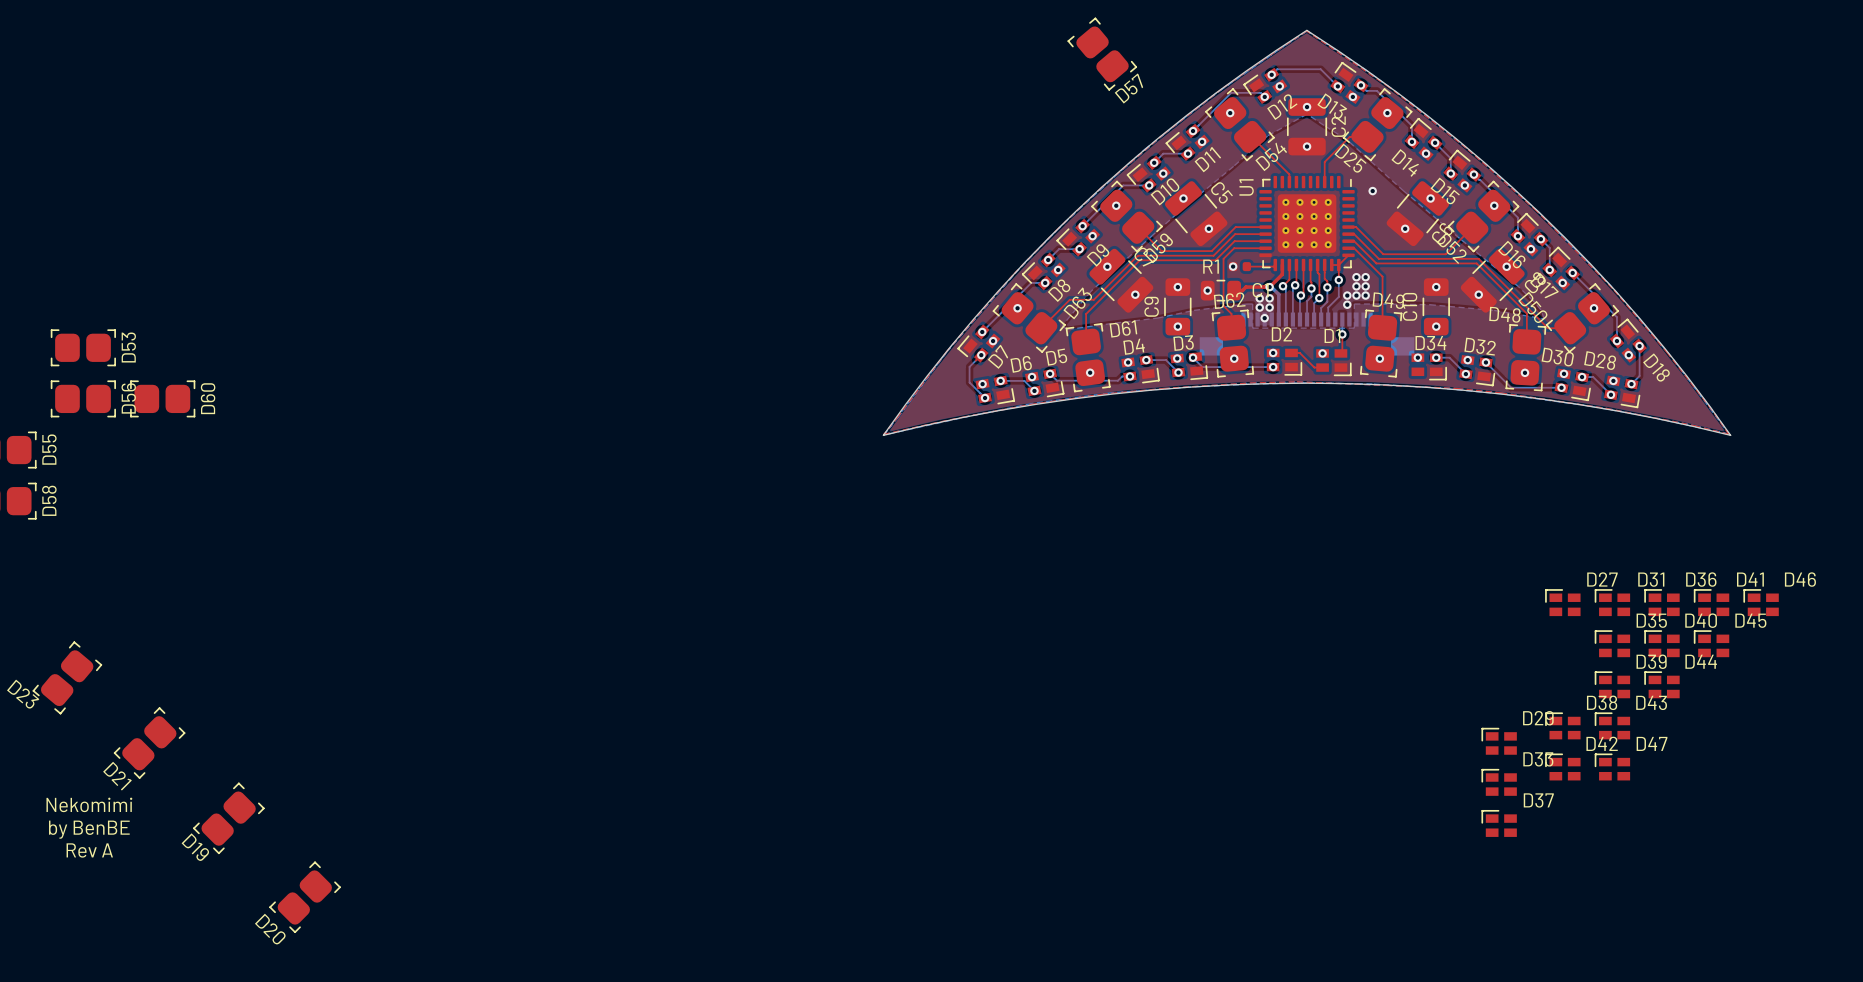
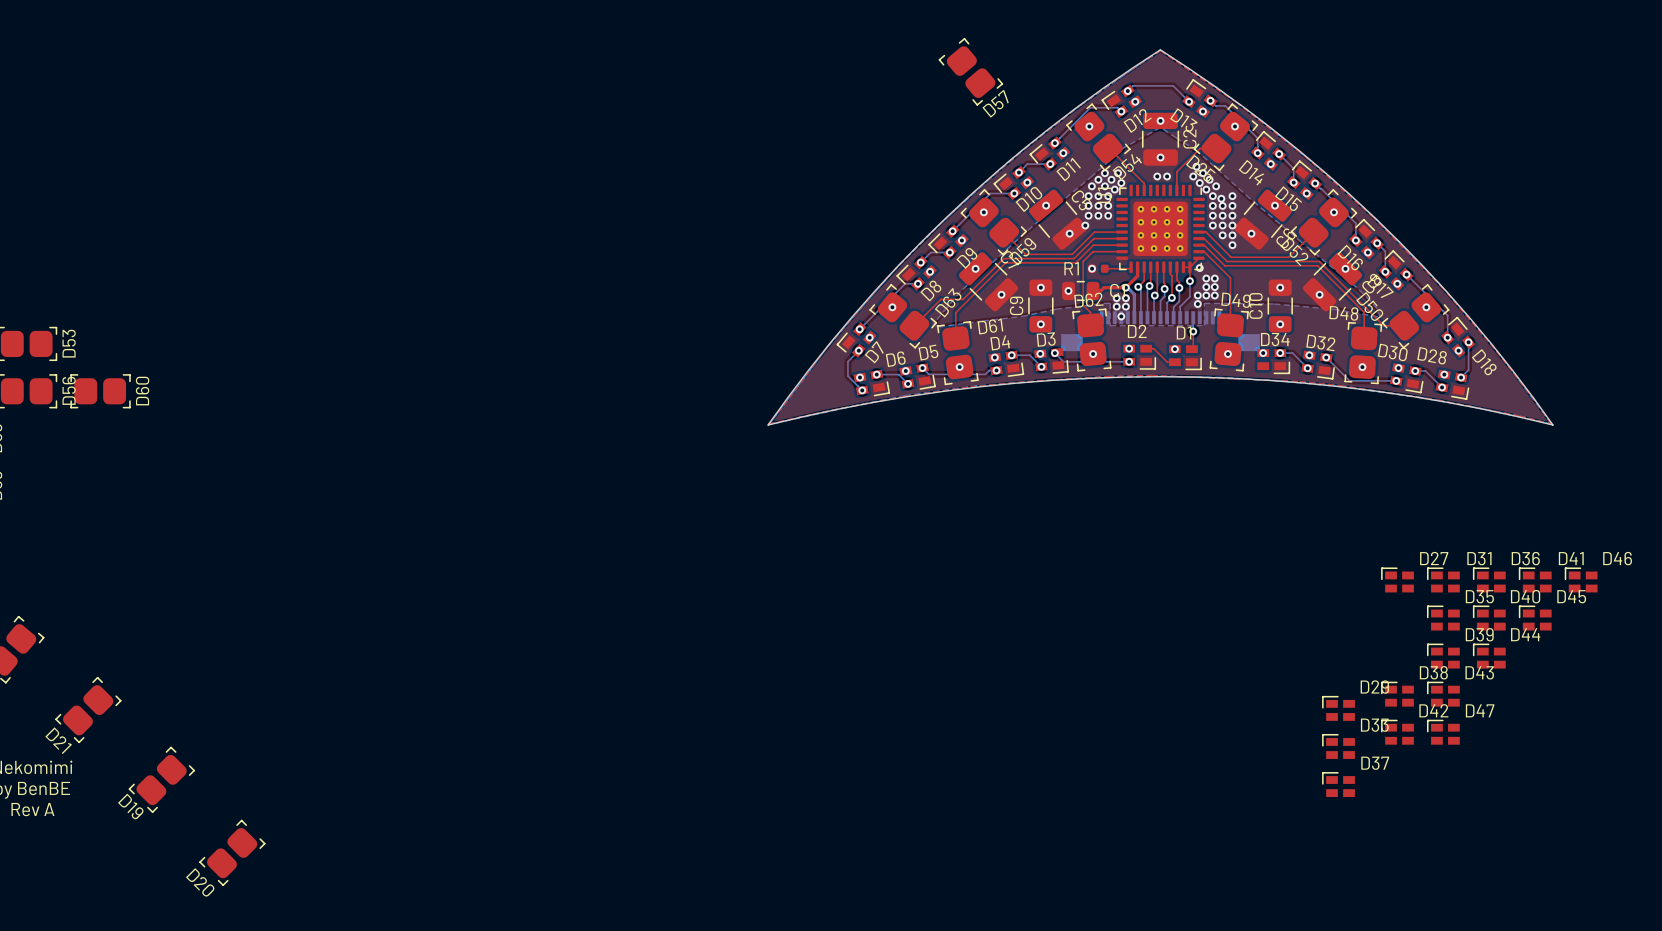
via: none -> (1196, 166)
via: none -> (1104, 173)
via: none -> (1118, 173)
via: none -> (1203, 173)
via: none -> (1157, 176)
via: none -> (1167, 176)
via: none -> (1193, 176)
via: none -> (1098, 179)
via: none -> (1111, 179)
via: none -> (1209, 179)
via: none -> (1121, 183)
via: none -> (1199, 183)
via: none -> (1091, 186)
via: none -> (1104, 186)
via: none -> (1216, 186)
via: none -> (1114, 189)
via: none -> (1206, 189)
via: none -> (1088, 196)
via: none -> (1098, 196)
via: none -> (1108, 196)
via: none -> (1212, 196)
via: none -> (1232, 196)
via: none -> (1088, 205)
via: none -> (1098, 205)
via: none -> (1108, 205)
via: none -> (1212, 205)
via: none -> (1222, 205)
via: none -> (1232, 205)
via: none -> (1088, 215)
via: none -> (1098, 215)
via: none -> (1108, 215)
via: none -> (1212, 215)
via: none -> (1222, 215)
via: none -> (1232, 215)
via: none -> (1085, 225)
via: none -> (1212, 225)
via: none -> (1222, 225)
via: none -> (1232, 225)
via: none -> (1222, 235)
via: none -> (1232, 235)
via: none -> (1232, 245)
via: none -> (1199, 268)

